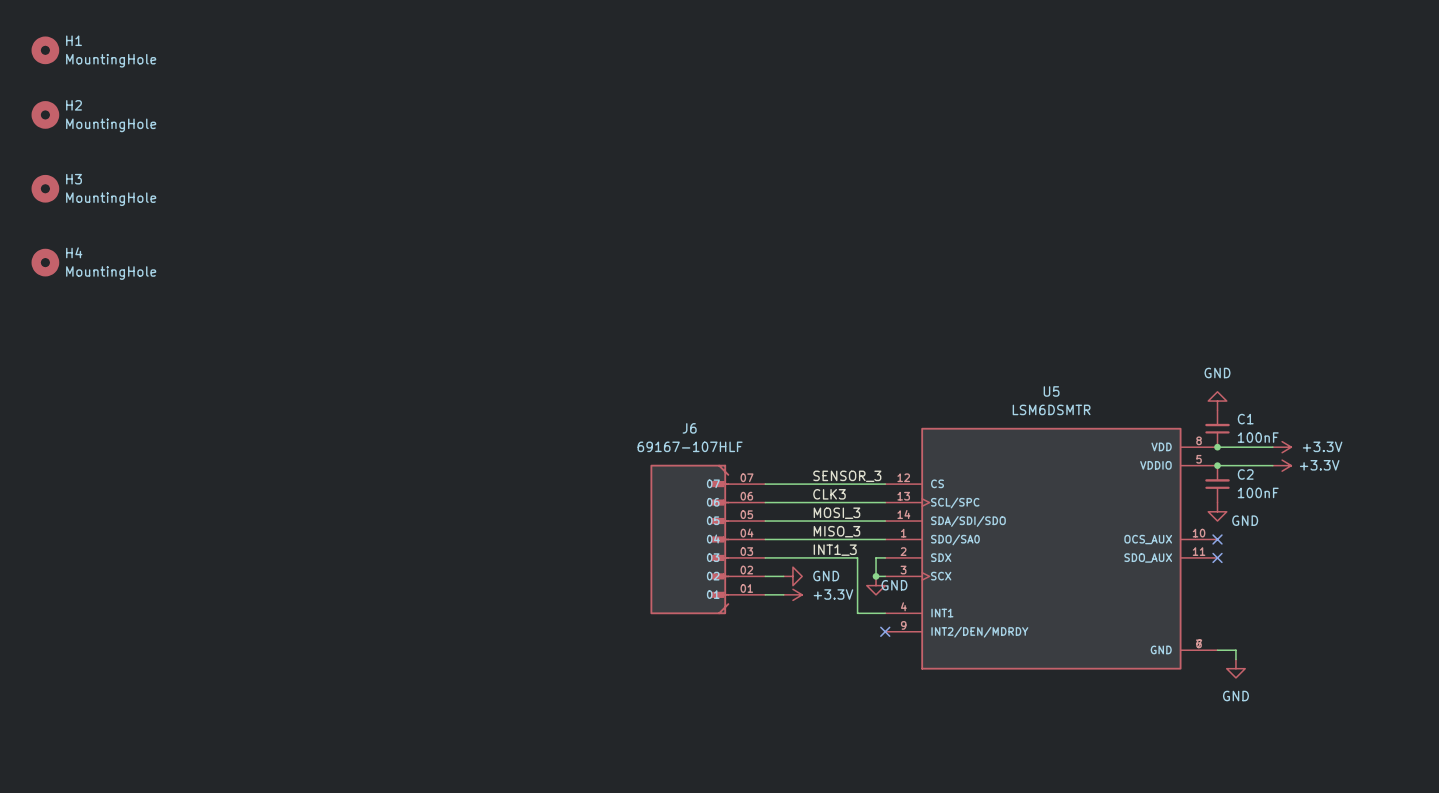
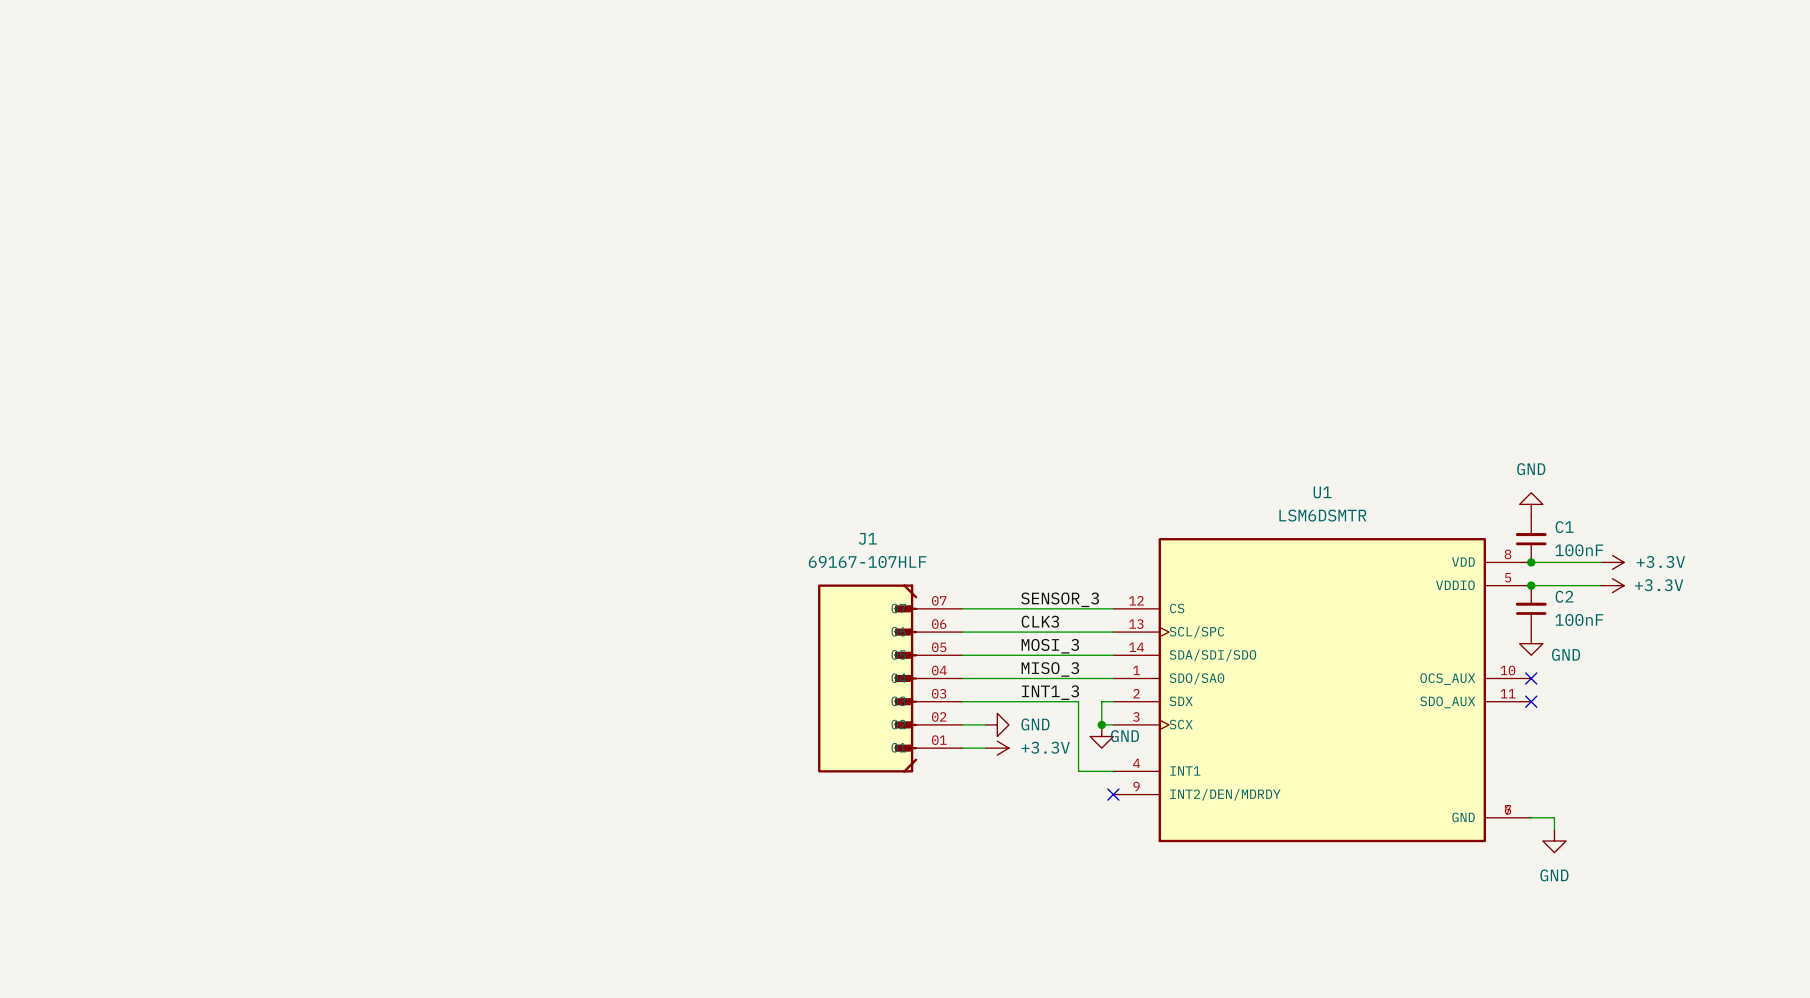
H1: MountingHole (45, 50) -> none
H2: MountingHole (45, 114) -> none
H3: MountingHole (45, 188) -> none
H4: MountingHole (45, 262) -> none
U5 name: U5 (1051, 391) -> U1 (1322, 492)
J6 name: J6 (689, 428) -> J1 (867, 538)

